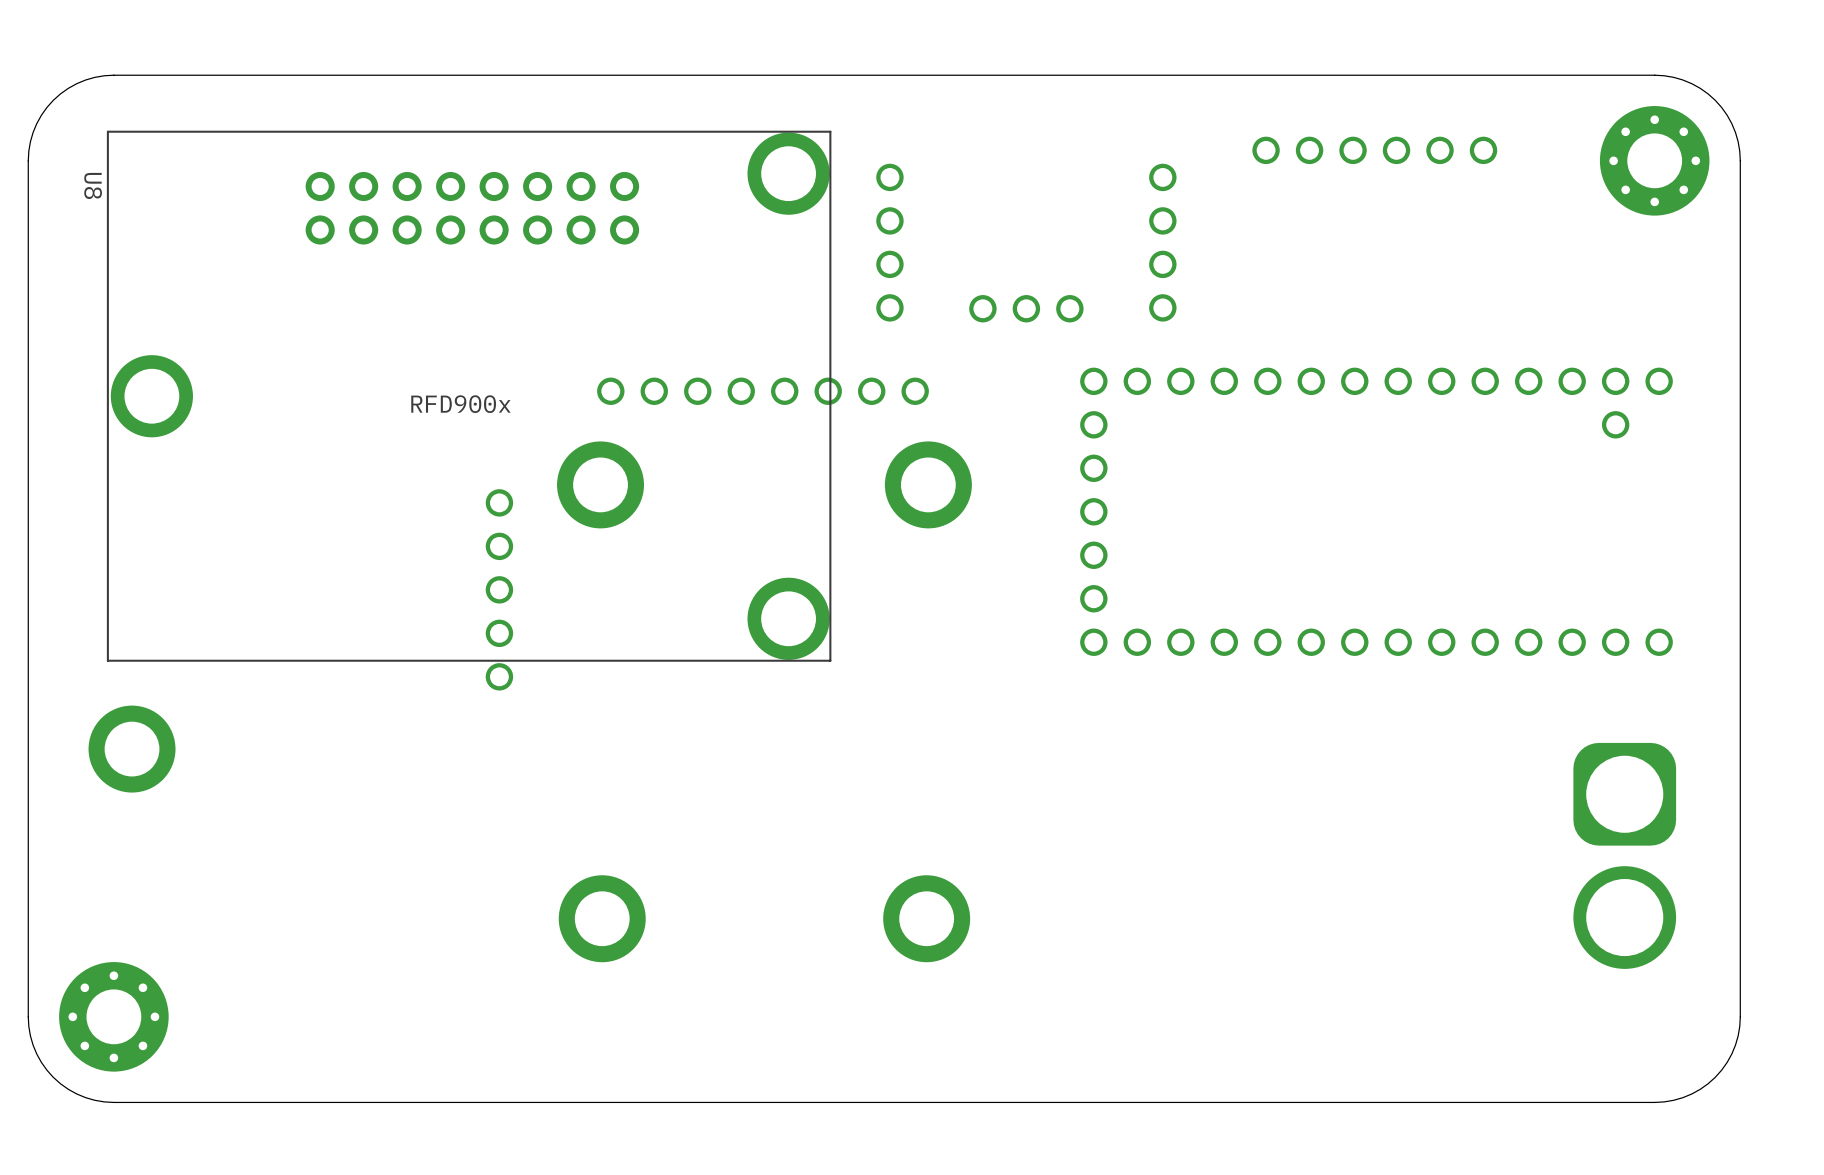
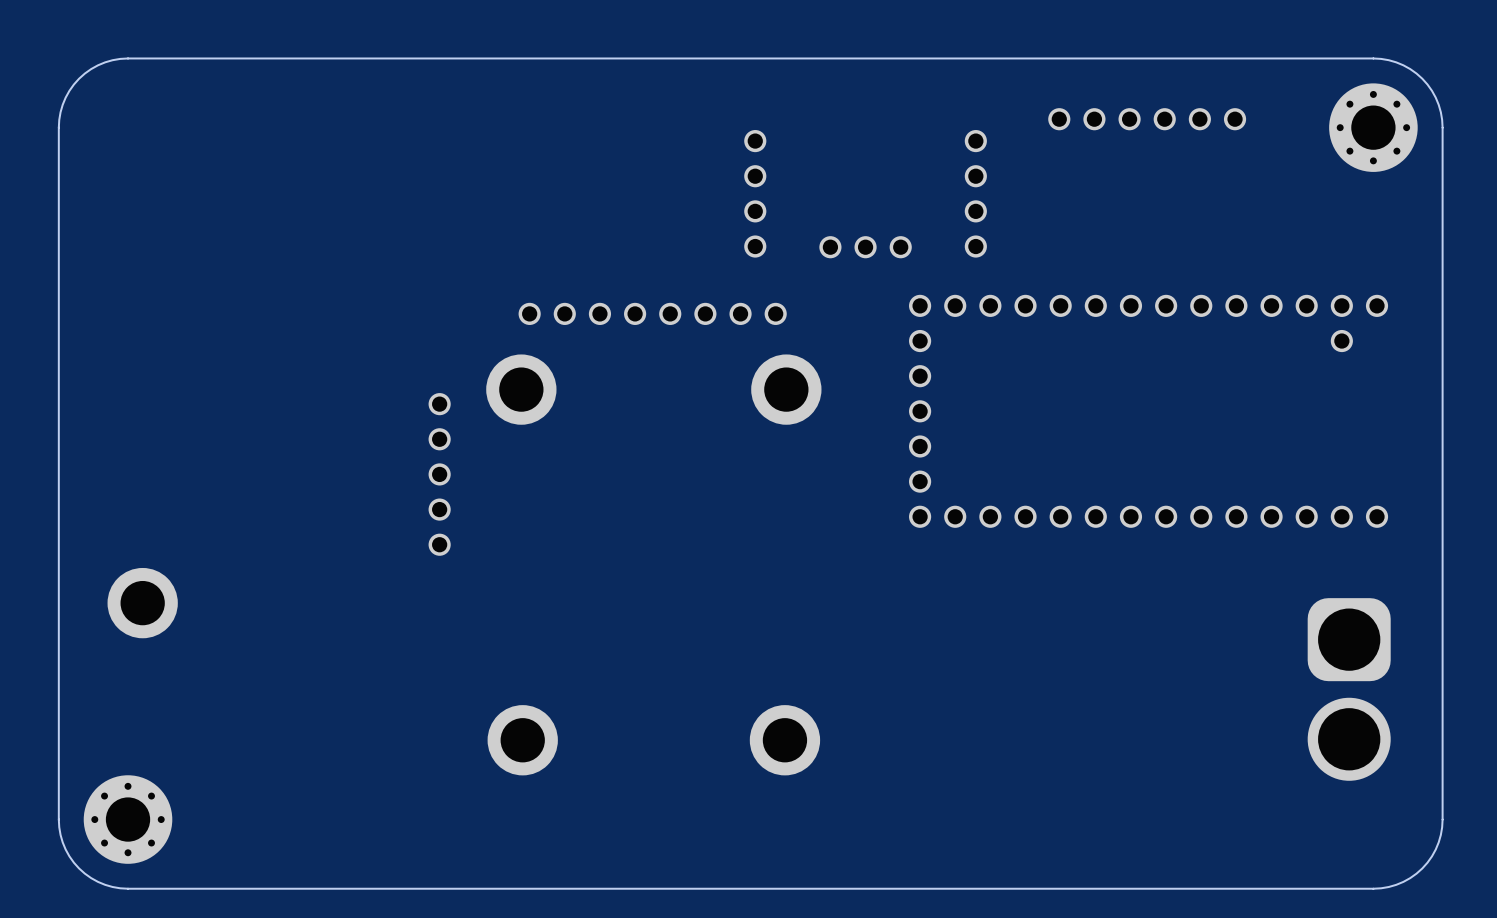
part: (472, 208) -> none
U8: (469, 396) -> none
text: RFD900x (460, 404) -> none

